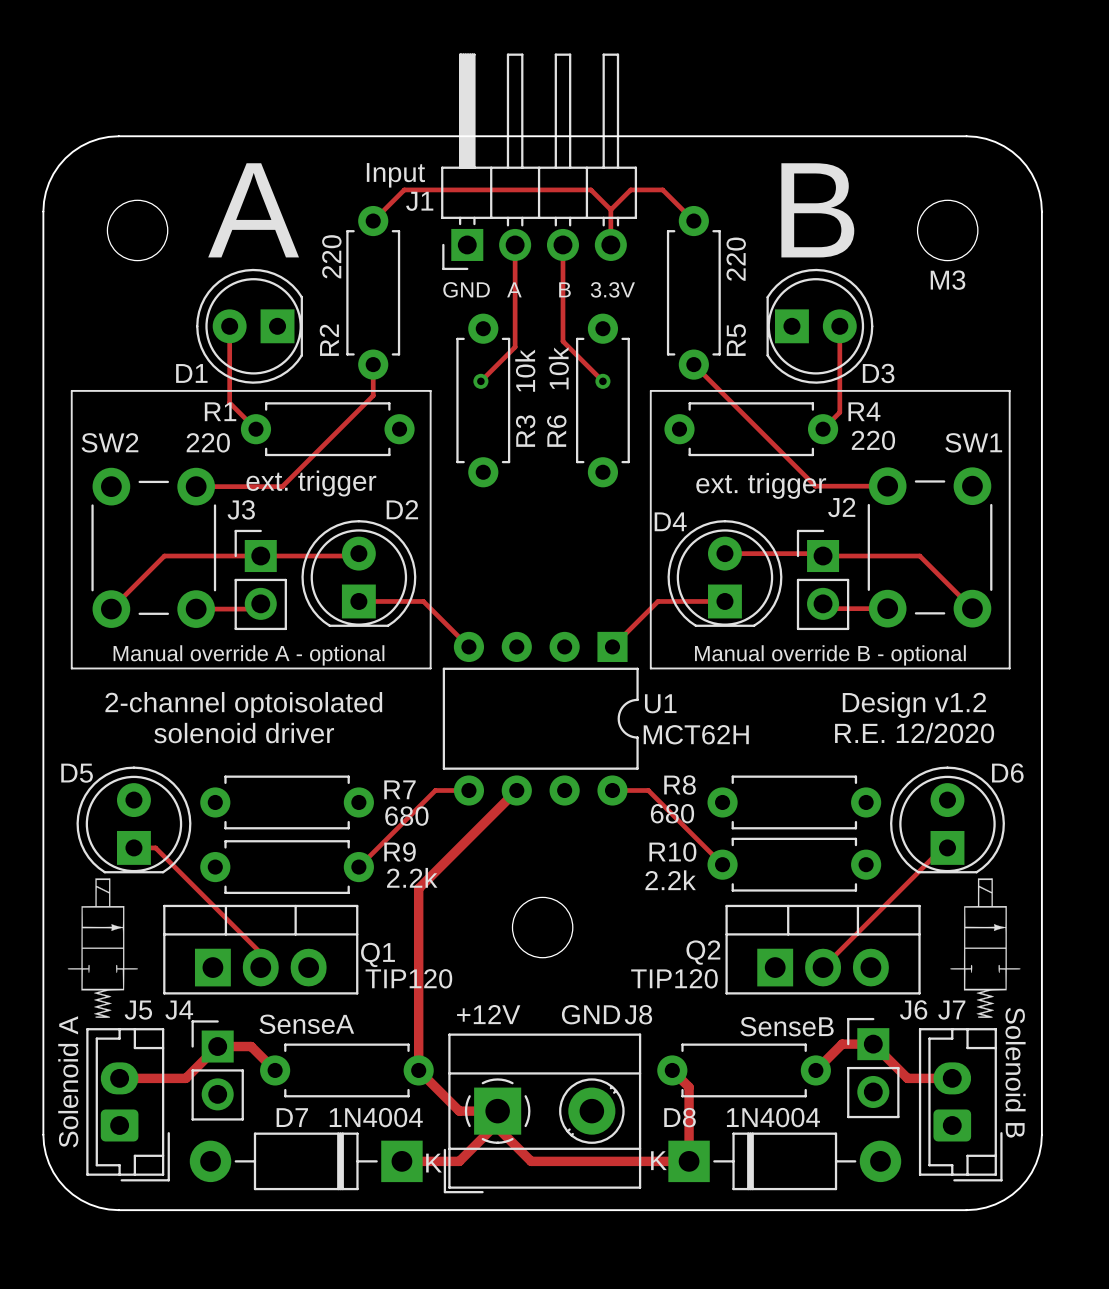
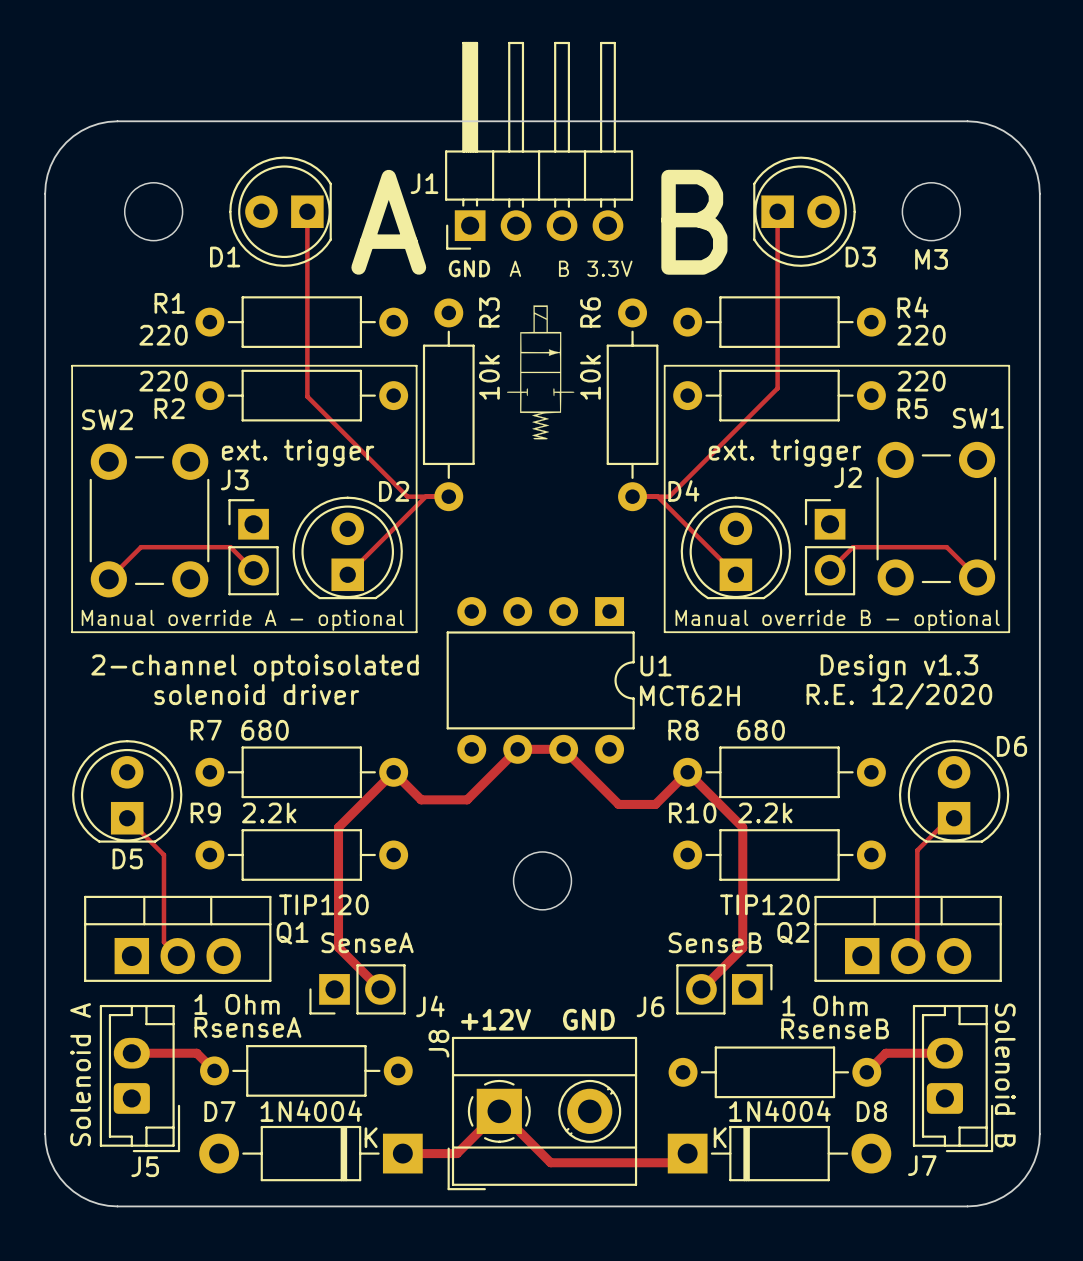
board edge: (118, 136) (89, 141) (65, 158) (49, 182) (43, 211) (44, 1144) (53, 1172) (72, 1194) (99, 1207) (118, 1210) (966, 1210) (995, 1204) (1012, 1194) (1026, 1180) (1036, 1163) (1041, 1134) (1041, 211) (1036, 182) (1019, 158) (995, 141) (966, 136) -> (135, 121) (98, 123) (73, 136) (60, 149) (50, 165) (45, 193) (45, 1143) (54, 1170) (73, 1191) (98, 1203) (117, 1206) (967, 1206) (995, 1200) (1011, 1191) (1024, 1178) (1034, 1161) (1039, 1134) (1039, 184) (1030, 157) (1011, 136) (986, 123) (949, 121)
J1 value: Input (395, 175) -> none
R2 footprint: [346, 205, 401, 380] -> [195, 369, 409, 422]
R5 footprint: [666, 205, 721, 380] -> [673, 369, 886, 422]
track: (610, 209) (610, 244) -> none
track: (610, 209) (590, 189) (404, 189) (373, 221) -> none
track: (610, 209) (630, 189) (662, 189) (693, 221) -> none
text position: A (253, 210) -> A (388, 222)
text position: B (817, 210) -> B (694, 222)
track: none -> (307, 211) (307, 396) (407, 496) (448, 496)
track: none -> (777, 211) (777, 388) (669, 496) (632, 496)
track: (515, 244) (515, 347) (480, 381) -> none
track: (562, 244) (562, 341) (602, 381) -> none
R2 value position: 220 (331, 256) -> 220 (163, 381)
R5 value position: 220 (736, 259) -> 220 (921, 381)
R3 footprint: [456, 313, 511, 488] -> [422, 298, 475, 512]
R6 footprint: [575, 313, 630, 488] -> [606, 298, 659, 512]
track: (229, 326) (229, 402) (255, 429) -> none
D1 position: (249, 326) -> (280, 211)
D3 position: (819, 326) -> (804, 211)
track: (839, 326) (839, 412) (823, 429) -> none
drawing: none -> [506, 305, 575, 440]
R2 name position: R2 (329, 340) -> R2 (169, 408)
R5 name position: R5 (736, 340) -> R5 (912, 408)
track: (373, 364) (373, 395) (282, 486) (196, 486) -> none
track: (693, 364) (815, 486) (887, 486) -> none
via: (480, 381) -> none
via: (602, 381) -> none
line: (71, 390) (71, 668) -> (90, 365) (72, 365) (72, 632) (90, 632)
line: (411, 390) (430, 390) (430, 668) (411, 668) -> (416, 365) (416, 632)
line: (669, 390) (650, 390) (650, 668) (669, 668) -> (664, 365) (664, 632)
line: (1009, 390) (1009, 668) -> (990, 365) (1009, 365) (1009, 632) (990, 632)
R1 footprint: [240, 402, 415, 457] -> [195, 296, 409, 348]
R4 footprint: [664, 402, 839, 457] -> [673, 296, 886, 348]
R3 name position: R3 (525, 431) -> R3 (489, 312)
R6 name position: R6 (556, 431) -> R6 (590, 312)
text position: ext. trigger (311, 483) -> ext. trigger (298, 453)
text position: ext. trigger (761, 485) -> ext. trigger (785, 453)
D2 name position: D2 (402, 509) -> D2 (394, 491)
D4 name position: D4 (670, 521) -> D4 (683, 490)
track: none -> (425, 496) (347, 574)
track: none -> (657, 496) (735, 574)
SW2 position: (153, 547) -> (149, 520)
SW1 position: (930, 547) -> (936, 518)
track: (358, 553) (356, 556) (164, 556) (111, 609) -> none
track: (724, 553) (919, 556) (972, 608) -> none
D2 position: (358, 573) -> (347, 547)
D4 position: (724, 573) -> (735, 547)
J3 position: (260, 579) -> (253, 547)
J2 position: (823, 579) -> (830, 547)
track: (358, 601) (423, 601) (468, 646) -> none
track: (724, 601) (657, 601) (612, 646) -> none
track: none -> (253, 570) (230, 547) (141, 547) (108, 579)
track: (260, 603) (255, 609) (196, 609) -> none
track: (823, 603) (827, 608) (887, 608) -> none
track: none -> (830, 570) (853, 547) (946, 547) (977, 577)
text position: Manual override A - optional (248, 655) -> Manual override A - optional (242, 620)
text position: Manual override B - optional (830, 655) -> Manual override B - optional (837, 620)
text: Design v1.2 (914, 704) -> Design v1.3 (899, 668)
D5 name position: D5 (77, 773) -> D5 (127, 858)
R7 footprint: [200, 775, 374, 830] -> [195, 746, 409, 799]
R8 footprint: [707, 775, 882, 830] -> [673, 746, 886, 799]
R7 name position: R7 (399, 789) -> R7 (206, 730)
track: (468, 790) (435, 790) (358, 867) -> none
track: none -> (517, 749) (563, 749) (618, 804) (655, 804) (687, 772) (742, 827) (742, 948) (701, 989)
track: (612, 790) (648, 790) (722, 864) -> none
R8 value position: 680 (672, 813) -> 680 (761, 730)
R7 value position: 680 (406, 816) -> 680 (265, 730)
D5 position: (133, 819) -> (127, 791)
D6 position: (947, 819) -> (954, 791)
R10 footprint: [707, 837, 882, 892] -> [673, 829, 886, 881]
R9 footprint: [200, 840, 374, 895] -> [195, 829, 409, 881]
track: (464, 843) (418, 888) (418, 1070) (459, 1111) (497, 1111) (497, 1127) (531, 1161) (689, 1161) (689, 1087) (672, 1070) -> (467, 799) (421, 799) (393, 772) (338, 827) (338, 947) (380, 989)
track: (133, 847) (155, 847) (260, 953) (260, 967) -> none
track: (947, 847) (942, 847) (823, 967) -> none
R9 name position: R9 (400, 852) -> R9 (205, 812)
R10 name position: R10 (672, 852) -> R10 (692, 812)
track: none -> (954, 813) (917, 850) (917, 946) (908, 956)
track: none -> (127, 818) (163, 854) (163, 942) (177, 956)
R9 value position: 2.2k (412, 877) -> 2.2k (269, 812)
drawing: [67, 878, 138, 1018] -> none
drawing: [950, 878, 1021, 1018] -> none
R10 value position: 2.2k (670, 880) -> 2.2k (765, 812)
Q1 position: (260, 949) -> (177, 938)
Q2 position: (823, 949) -> (908, 938)
Q2 name position: Q2 (703, 952) -> Q2 (793, 933)
Q1 name position: Q1 (377, 954) -> Q1 (292, 933)
Q1 value position: TIP120 (408, 978) -> TIP120 (323, 904)
Q2 value position: TIP120 (674, 978) -> TIP120 (764, 904)
J6 name position: J6 (913, 1009) -> J6 (650, 1006)
J5 name position: J5 (138, 1010) -> J5 (145, 1166)
J4 name position: J4 (179, 1010) -> J4 (430, 1006)
J7 name position: J7 (951, 1010) -> J7 (922, 1165)
text position: +12V (488, 1014) -> +12V (496, 1019)
text position: GND (591, 1014) -> GND (588, 1019)
J8 name rotation: 0° (638, 1014) -> 90° counterclockwise (438, 1043)
J8 name position: J8 (638, 1014) -> J8 (438, 1043)
J4 value position: SenseA (306, 1024) -> SenseA (367, 942)
J6 value position: SenseB (787, 1026) -> SenseB (715, 942)
J6 rotation: 0° (873, 1068) -> 90° clockwise (724, 989)
J6 position: (873, 1068) -> (724, 989)
J4 rotation: 0° (217, 1070) -> 90° counterclockwise (357, 989)
J4 position: (217, 1070) -> (357, 989)
track: (275, 1070) (251, 1046) (217, 1046) (185, 1078) (119, 1078) -> none
part: (346, 1070) -> none
part: (744, 1070) -> none
track: (815, 1070) (842, 1044) (873, 1044) (907, 1078) (952, 1078) -> none
J7 value position: Solenoid B (1015, 1072) -> Solenoid B (1005, 1075)
J5 value position: Solenoid A (68, 1081) -> Solenoid A (80, 1074)
J5 position: (128, 1104) -> (139, 1078)
J7 position: (960, 1104) -> (953, 1078)
track: none -> (131, 1053) (196, 1053) (214, 1070)
track: none -> (944, 1053) (885, 1053) (866, 1072)
J8 position: (542, 1113) -> (542, 1113)
D7 name position: D7 (292, 1117) -> D7 (219, 1111)
D7 value position: 1N4004 (376, 1117) -> 1N4004 (311, 1111)
D8 name position: D8 (680, 1117) -> D8 (871, 1111)
D8 value position: 1N4004 (773, 1117) -> 1N4004 (779, 1111)
track: (497, 1123) (459, 1161) (401, 1161) -> none
RsenseA: none -> 1 Ohm (306, 1070)
RsenseB: none -> 1 Ohm (774, 1072)
D8 text position: K (658, 1160) -> K (720, 1137)
D7 position: (306, 1161) -> (310, 1153)
D8 position: (784, 1161) -> (779, 1153)
D7 text position: K (434, 1163) -> K (371, 1137)
track: none -> (402, 1153) (457, 1153) (499, 1111) (550, 1162) (678, 1162) (687, 1153)

